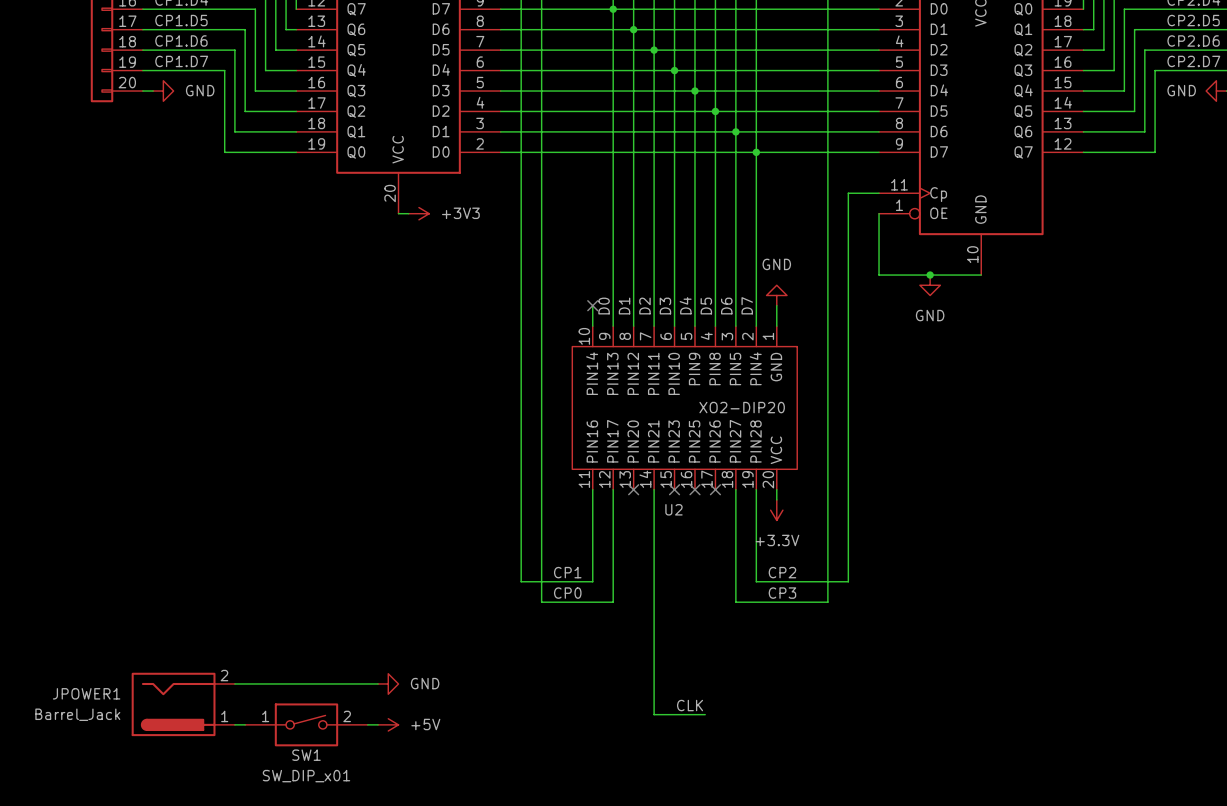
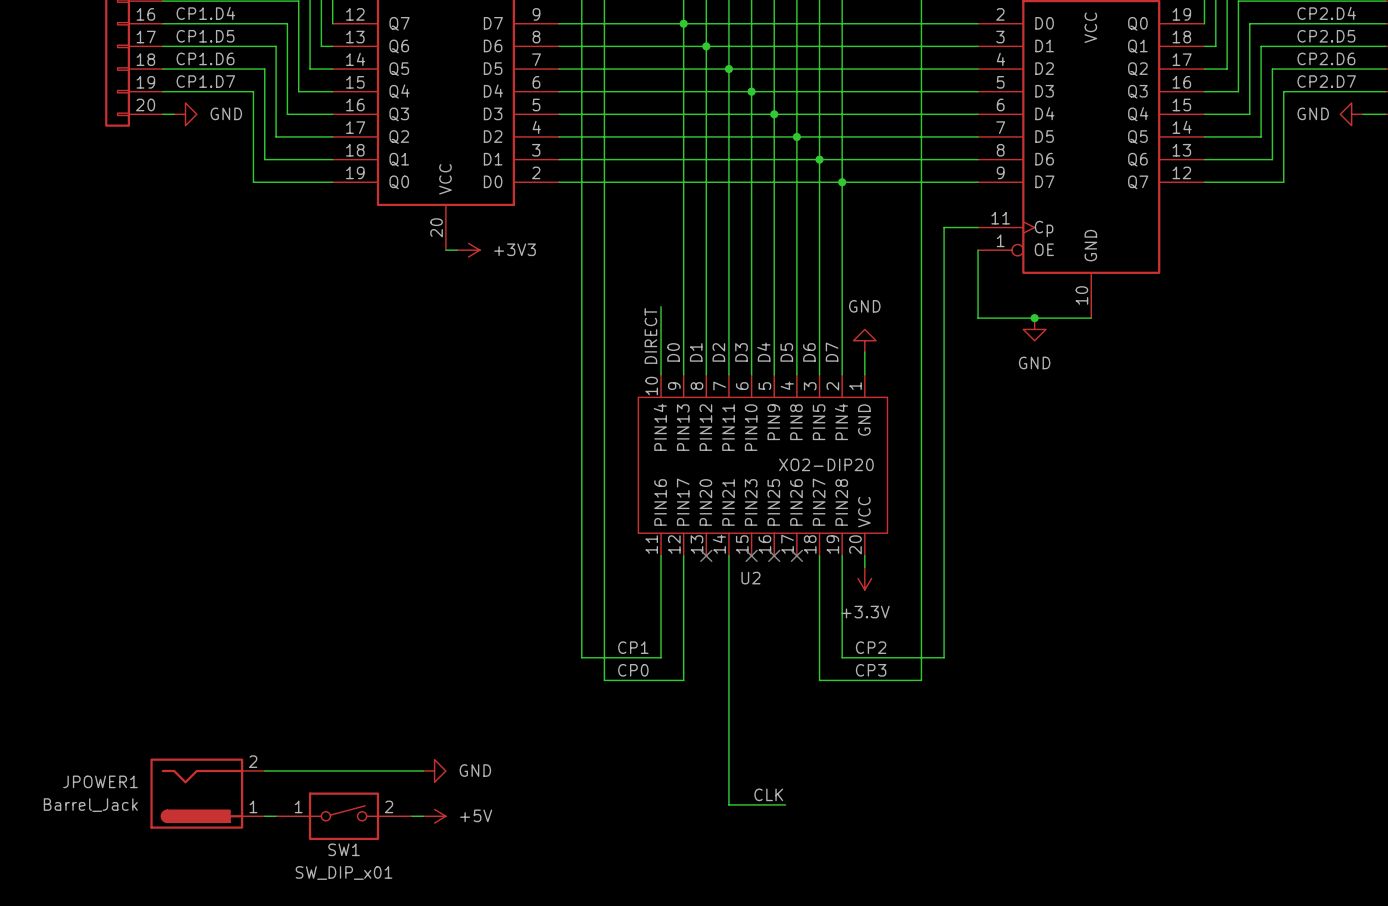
wire: none -> (661, 306) (661, 352)
label: none -> DIRECT (650, 335)
no-connect mark: (592, 305) -> none

